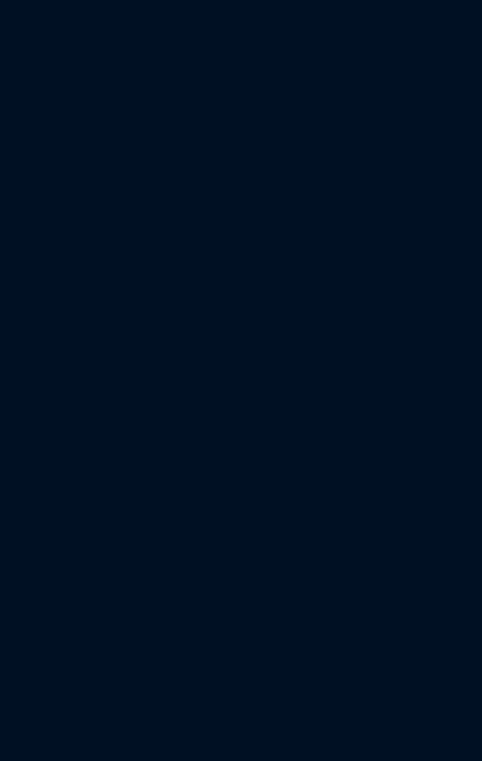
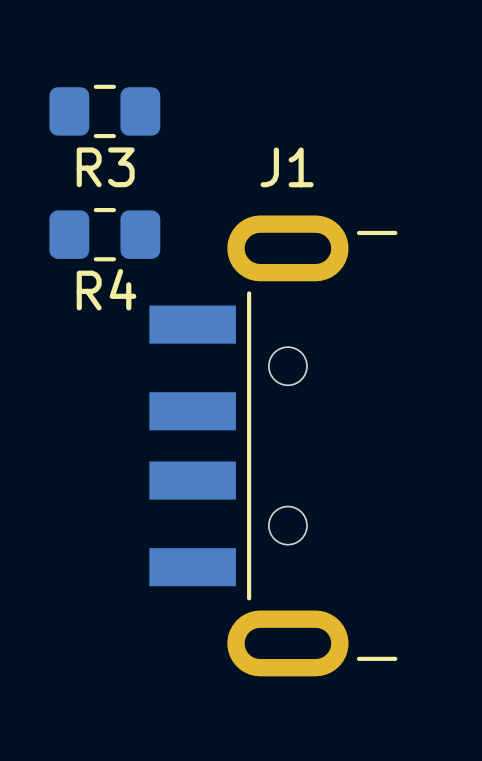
R3: none -> (104, 111)
R4: none -> (104, 234)
J1: none -> (273, 445)

